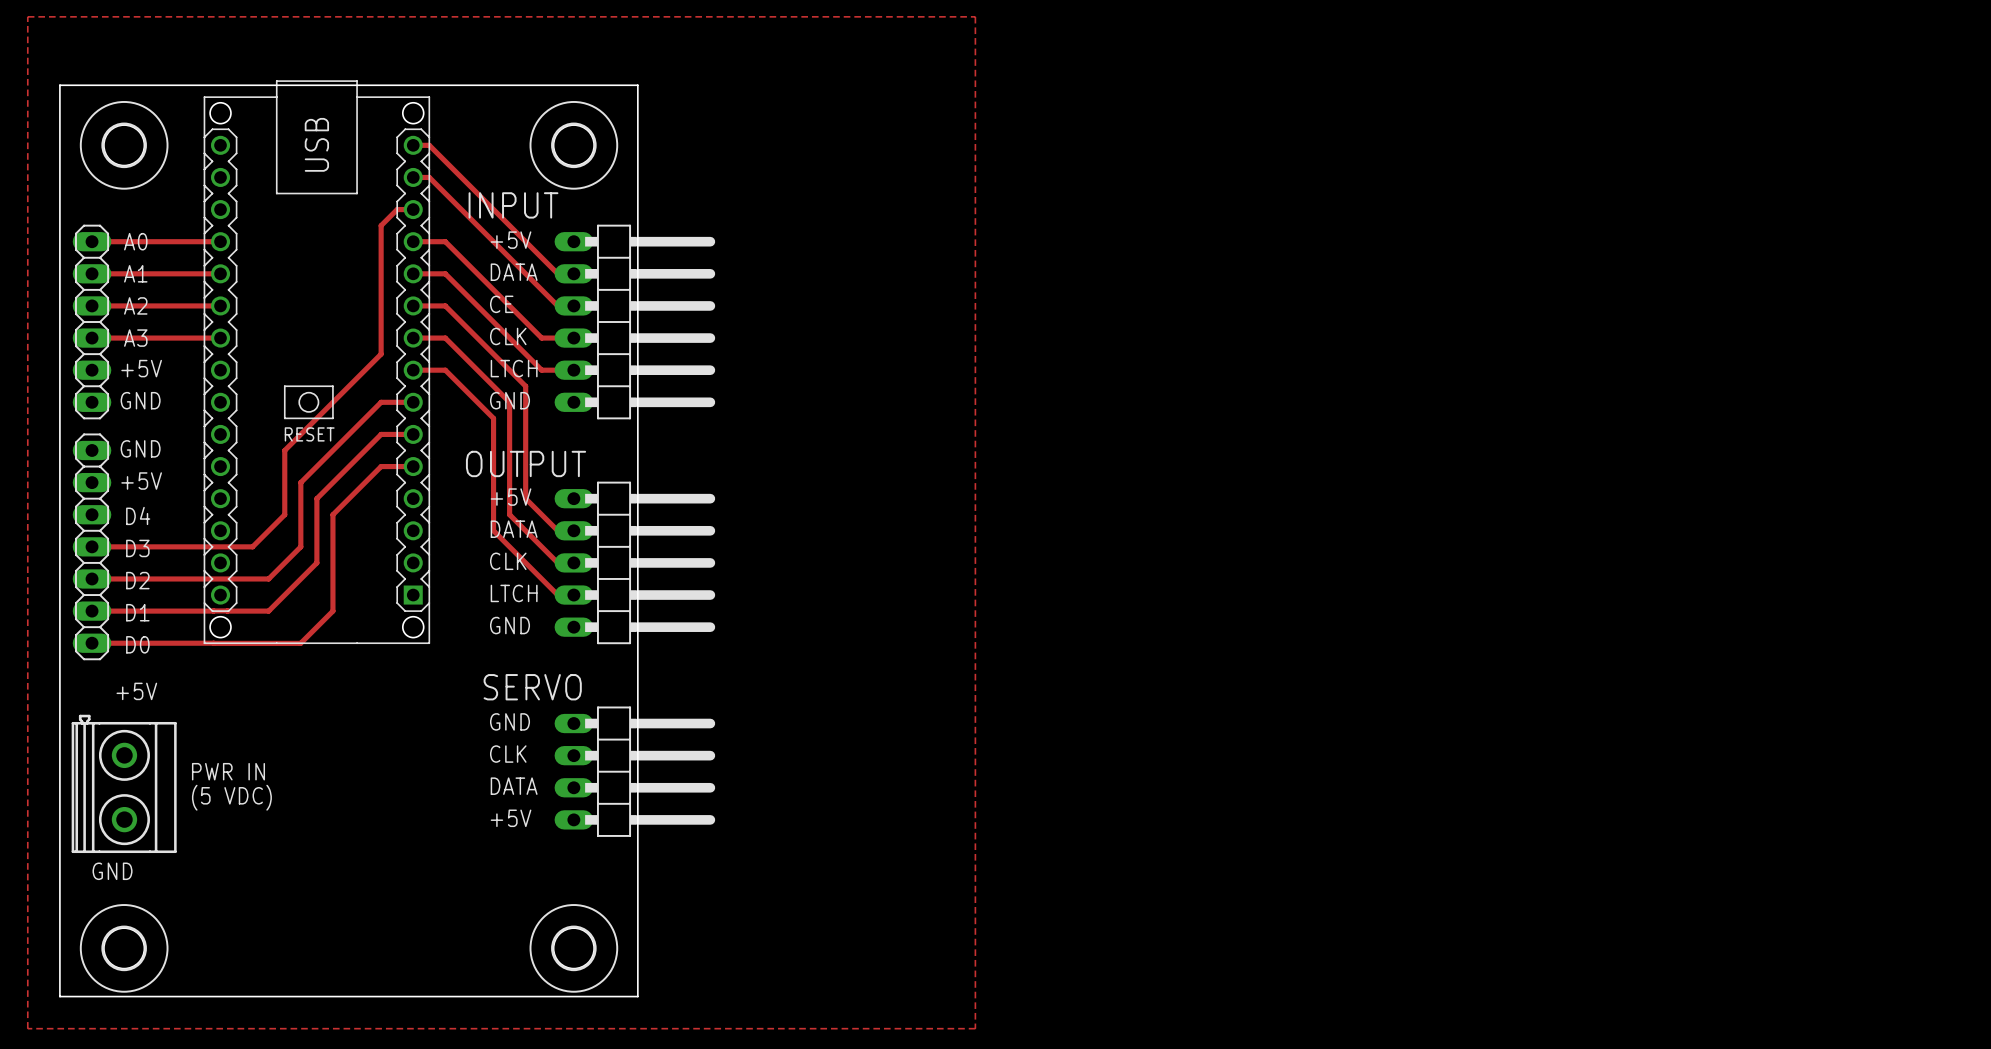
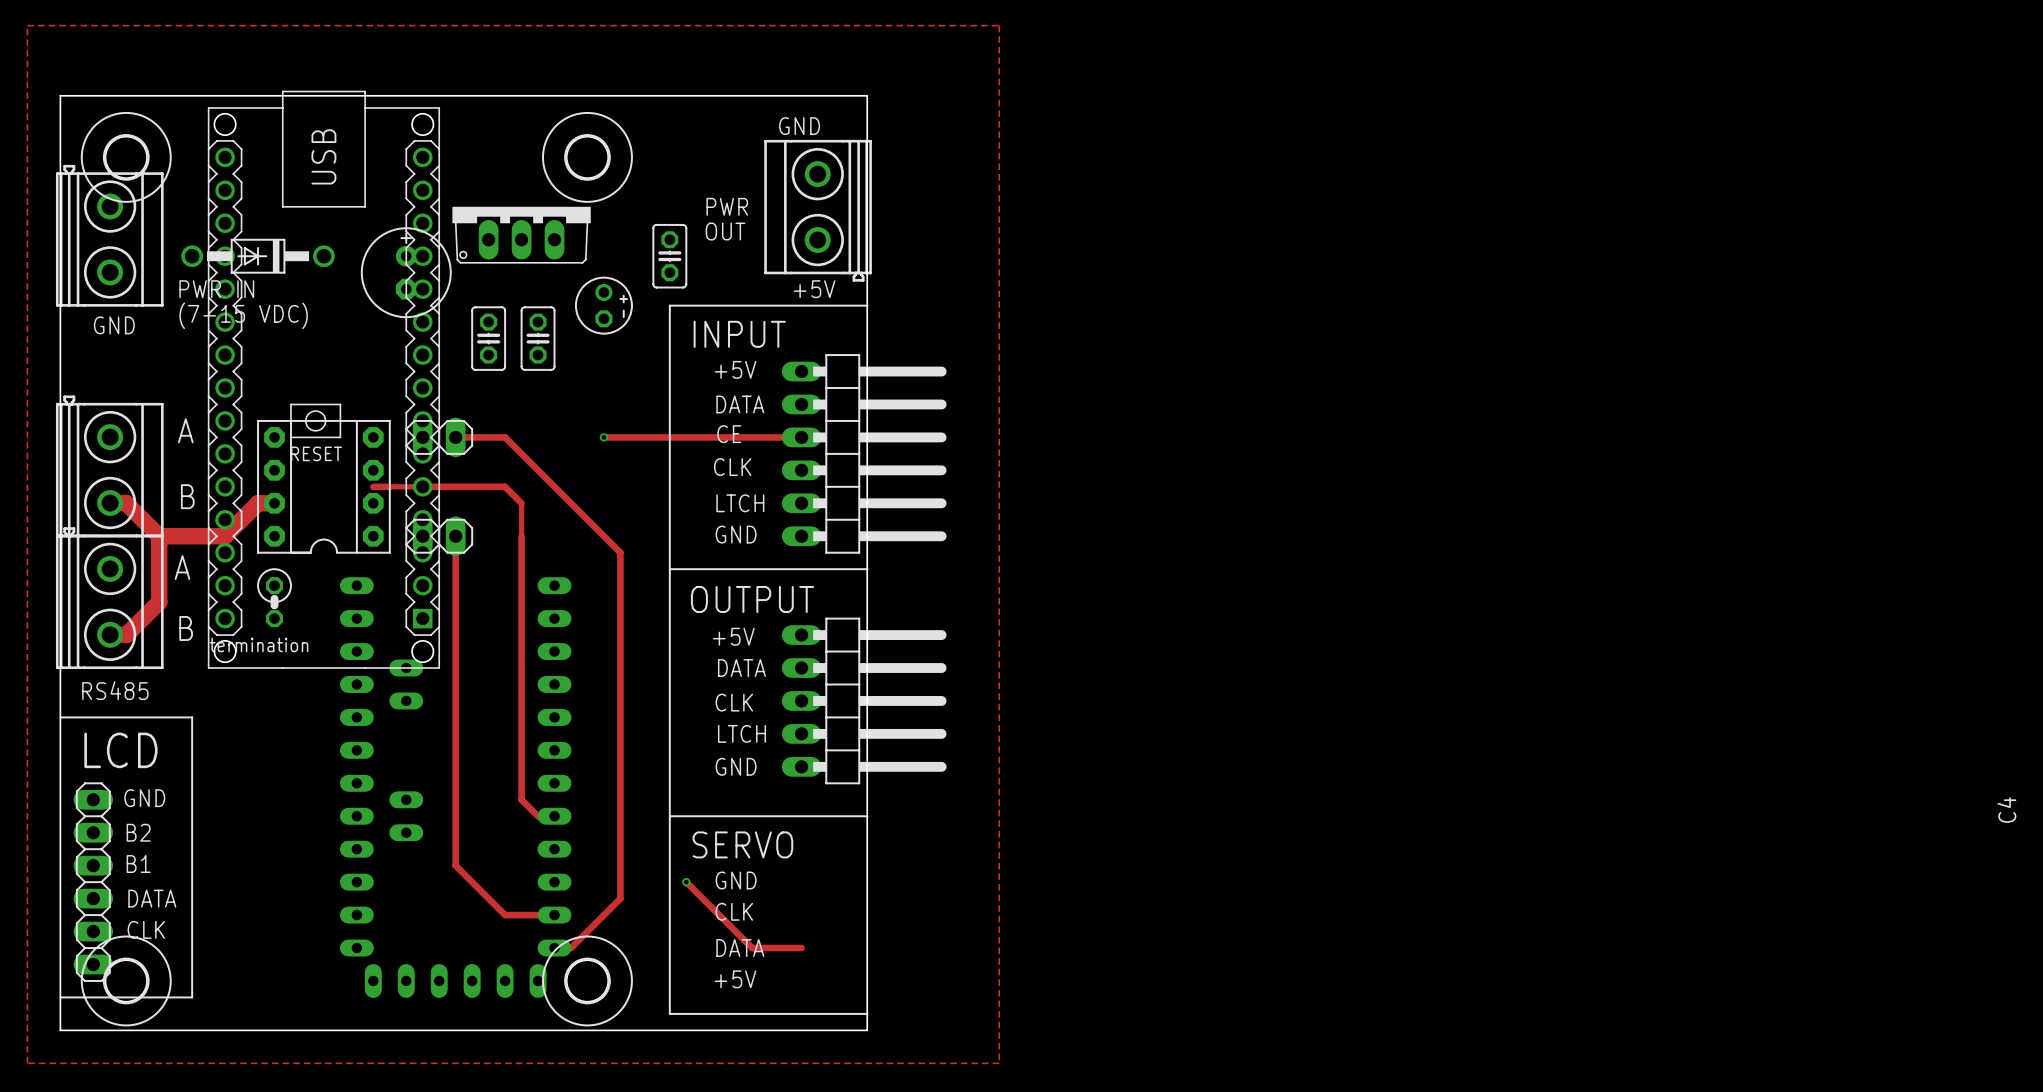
board edge: (637, 85) (637, 996) -> (653, 95) (867, 95) (867, 1030) (653, 1030)
text: none -> GND (799, 126)
track: (413, 145) (429, 145) (557, 273) (573, 273) -> none
track: (413, 177) (429, 177) (557, 305) (573, 305) -> none
text: none -> PWR (727, 206)
part: none -> (818, 210)
text position: INPUT (513, 205) -> INPUT (739, 334)
track: (413, 209) (397, 209) (381, 225) (381, 354) (284, 450) (284, 514) (252, 546) (92, 546) -> none
text: none -> OUT (725, 231)
part: none -> (109, 235)
part: none -> (521, 235)
text: +5V (511, 240) -> none
track: (92, 241) (220, 241) -> none
text: A0 (135, 241) -> none
part: none -> (258, 256)
track: (413, 241) (445, 241) (541, 338) (573, 338) -> none
part: none -> (669, 256)
part: none -> (406, 272)
text: DATA (514, 272) -> none
track: (92, 273) (220, 273) -> none
text: A1 (135, 273) -> none
text: none -> PWR IN (216, 289)
track: (413, 273) (445, 273) (541, 370) (573, 370) -> none
text: none -> +5V (814, 289)
C4: none -> (603, 305)
line: none -> (867, 305) (669, 305) (669, 1013) (867, 1013)
text: none -> (7-15 VDC) (243, 315)
text position: CE (501, 304) -> CE (729, 434)
track: (92, 305) (220, 305) -> none
text: A2 (135, 305) -> none
track: (413, 305) (445, 305) (525, 386) (525, 498) (557, 530) (573, 530) -> none
text: none -> GND (114, 325)
part: (92, 322) -> none
part: none -> (488, 338)
part: none -> (538, 338)
part position: (634, 322) -> (864, 453)
text: CLK (508, 336) -> none
track: (92, 338) (220, 338) -> none
text: A3 (135, 338) -> none
track: (413, 338) (445, 338) (509, 402) (509, 482) -> (422, 486) (505, 486) (521, 503)
text: none -> +5V (735, 369)
text: +5V (141, 368) -> none
text: LTCH (514, 368) -> none
track: (413, 370) (445, 370) (493, 418) (493, 530) (557, 595) (573, 595) -> none
text: none -> DATA (740, 404)
text: GND (140, 400) -> none
text: GND (510, 400) -> none
track: (413, 402) (381, 402) (300, 482) (300, 546) (268, 578) (92, 578) -> none
text: none -> A (185, 430)
part: none -> (439, 437)
track: none -> (455, 437) (505, 437) (620, 552) (620, 898) (570, 948) (554, 948)
track: none -> (603, 437) (801, 437)
via: none -> (603, 437)
track: (413, 434) (381, 434) (316, 498) (316, 562) (268, 611) (227, 611) -> none
part: none -> (109, 466)
text: none -> CLK (732, 467)
text: GND (140, 448) -> none
text position: OUTPUT (526, 463) -> OUTPUT (752, 599)
part: none -> (323, 486)
track: (381, 466) (332, 514) (332, 611) (300, 643) (213, 643) -> (389, 486) (373, 486)
text: none -> B (187, 496)
text: +5V (141, 481) -> none
track: none -> (110, 503) (125, 503) (159, 536)
track: none -> (274, 503) (258, 503) (225, 536) (159, 536)
text: none -> LTCH (740, 503)
text: +5V (511, 497) -> none
text: none -> GND (736, 534)
track: none -> (159, 536) (159, 602) (126, 635) (110, 634)
part: none -> (439, 536)
track: none -> (455, 536) (455, 865) (505, 915) (554, 915)
track: (509, 514) (557, 562) (573, 562) -> (521, 536) (521, 799) (538, 816) (554, 816)
text: D4 (138, 515) -> none
text: DATA (514, 529) -> none
text: none -> A (182, 567)
part: (92, 546) -> none
line: none -> (669, 569) (867, 569)
text: D3 (137, 548) -> none
text: CLK (508, 561) -> none
part position: (634, 562) -> (864, 700)
part: none -> (274, 597)
part: none -> (109, 598)
text: D2 (137, 580) -> none
text: LTCH (514, 593) -> none
text: none -> B (186, 628)
track: (213, 610) (227, 610) -> none
track: (92, 611) (213, 611) -> none
text: D1 (137, 612) -> none
text: none -> +5V (733, 636)
text: none -> termination (259, 644)
text: GND (510, 625) -> none
track: (92, 643) (213, 643) -> none
text: none -> DATA (741, 668)
text: D0 (137, 644) -> none
text: none -> RS485 (115, 690)
text: none -> CLK (734, 702)
text position: SERVO (532, 687) -> SERVO (742, 844)
line: none -> (60, 717) (192, 717) (192, 997) (60, 997)
text: +5V (136, 691) -> none
text: none -> LTCH (741, 733)
text: GND (510, 721) -> none
text: none -> LCD (120, 750)
text: none -> GND (736, 766)
text: CLK (508, 754) -> none
part: none -> (455, 787)
text: PWR IN (228, 771) -> none
part: (634, 771) -> none
part: (124, 783) -> none
text: DATA (514, 786) -> none
line: none -> (669, 816) (867, 816)
text: (5 VDC) (231, 797) -> none
text: none -> B2 (138, 832)
text: +5V (511, 818) -> none
text: none -> B1 (138, 864)
text: none -> GND (736, 880)
part: none -> (93, 882)
track: none -> (686, 882) (752, 948) (801, 948)
via: none -> (686, 882)
text: none -> DATA (152, 898)
text position: GND (112, 871) -> GND (144, 798)
text: none -> CLK (734, 911)
text: none -> CLK (146, 929)
text: none -> DATA (740, 948)
text: none -> +5V (735, 979)

